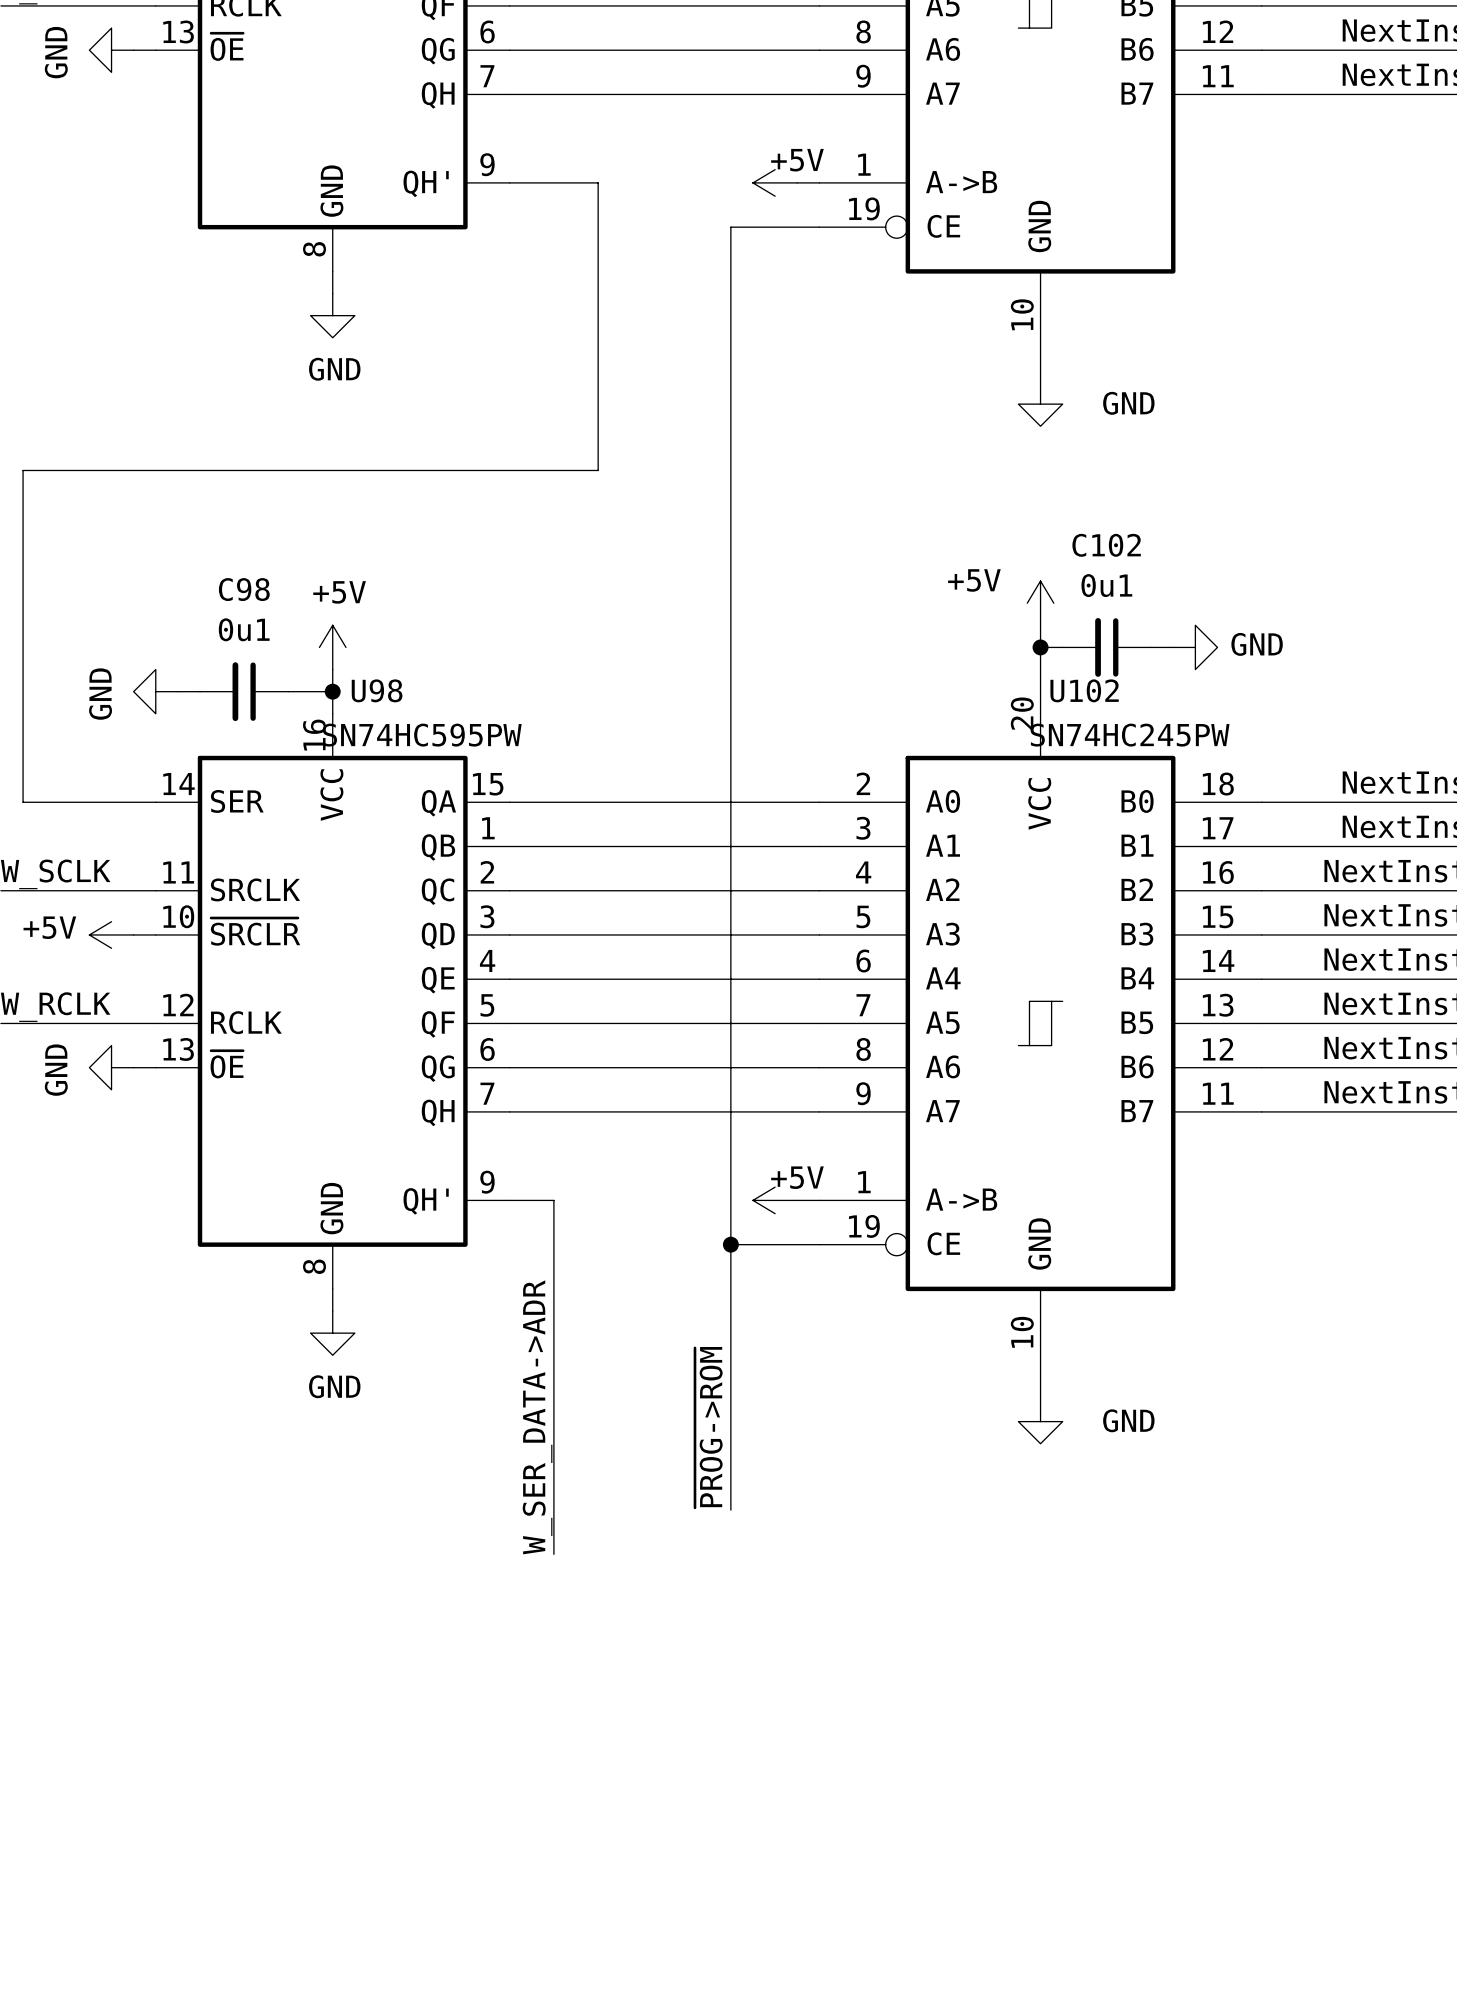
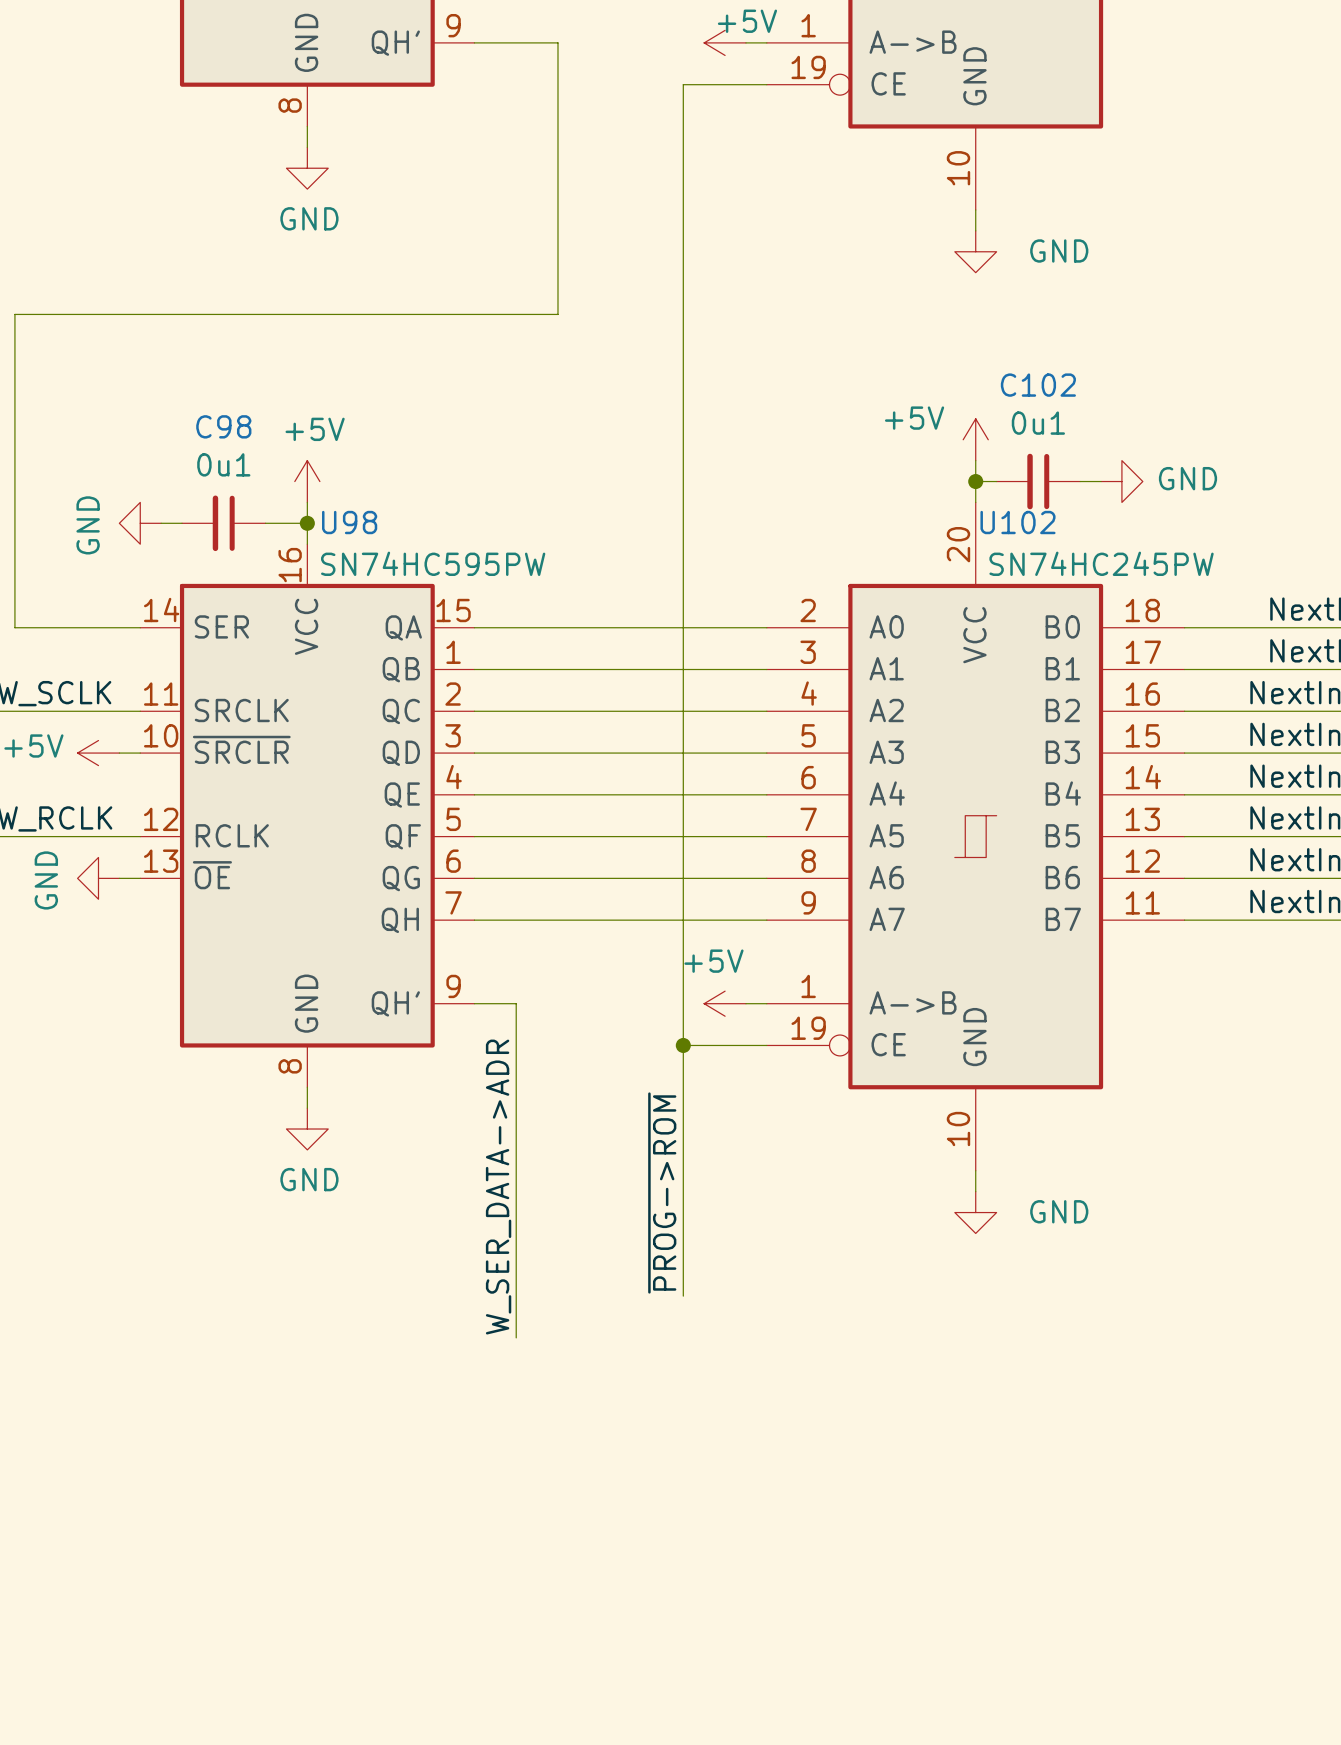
U98 value position: SN74HC595PW (422, 735) -> SN74HC595PW (433, 563)
U102 value position: SN74HC245PW (1130, 735) -> SN74HC245PW (1101, 563)
power symbol text position: +5V (797, 1177) -> +5V (713, 961)

